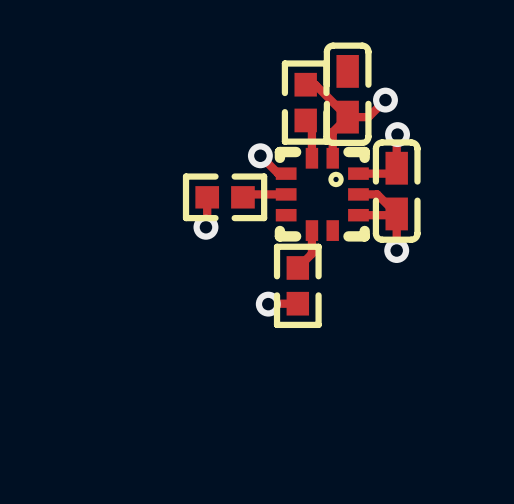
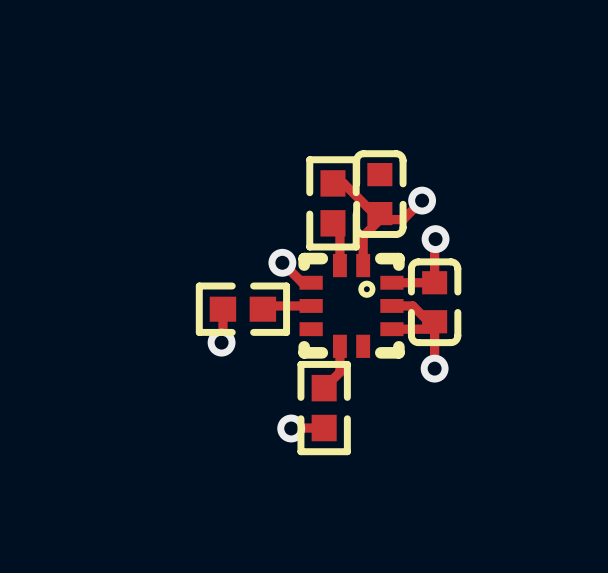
part footprint: [323, 42, 372, 147] -> [353, 150, 407, 238]
part footprint: [372, 139, 421, 243] -> [407, 258, 462, 347]

